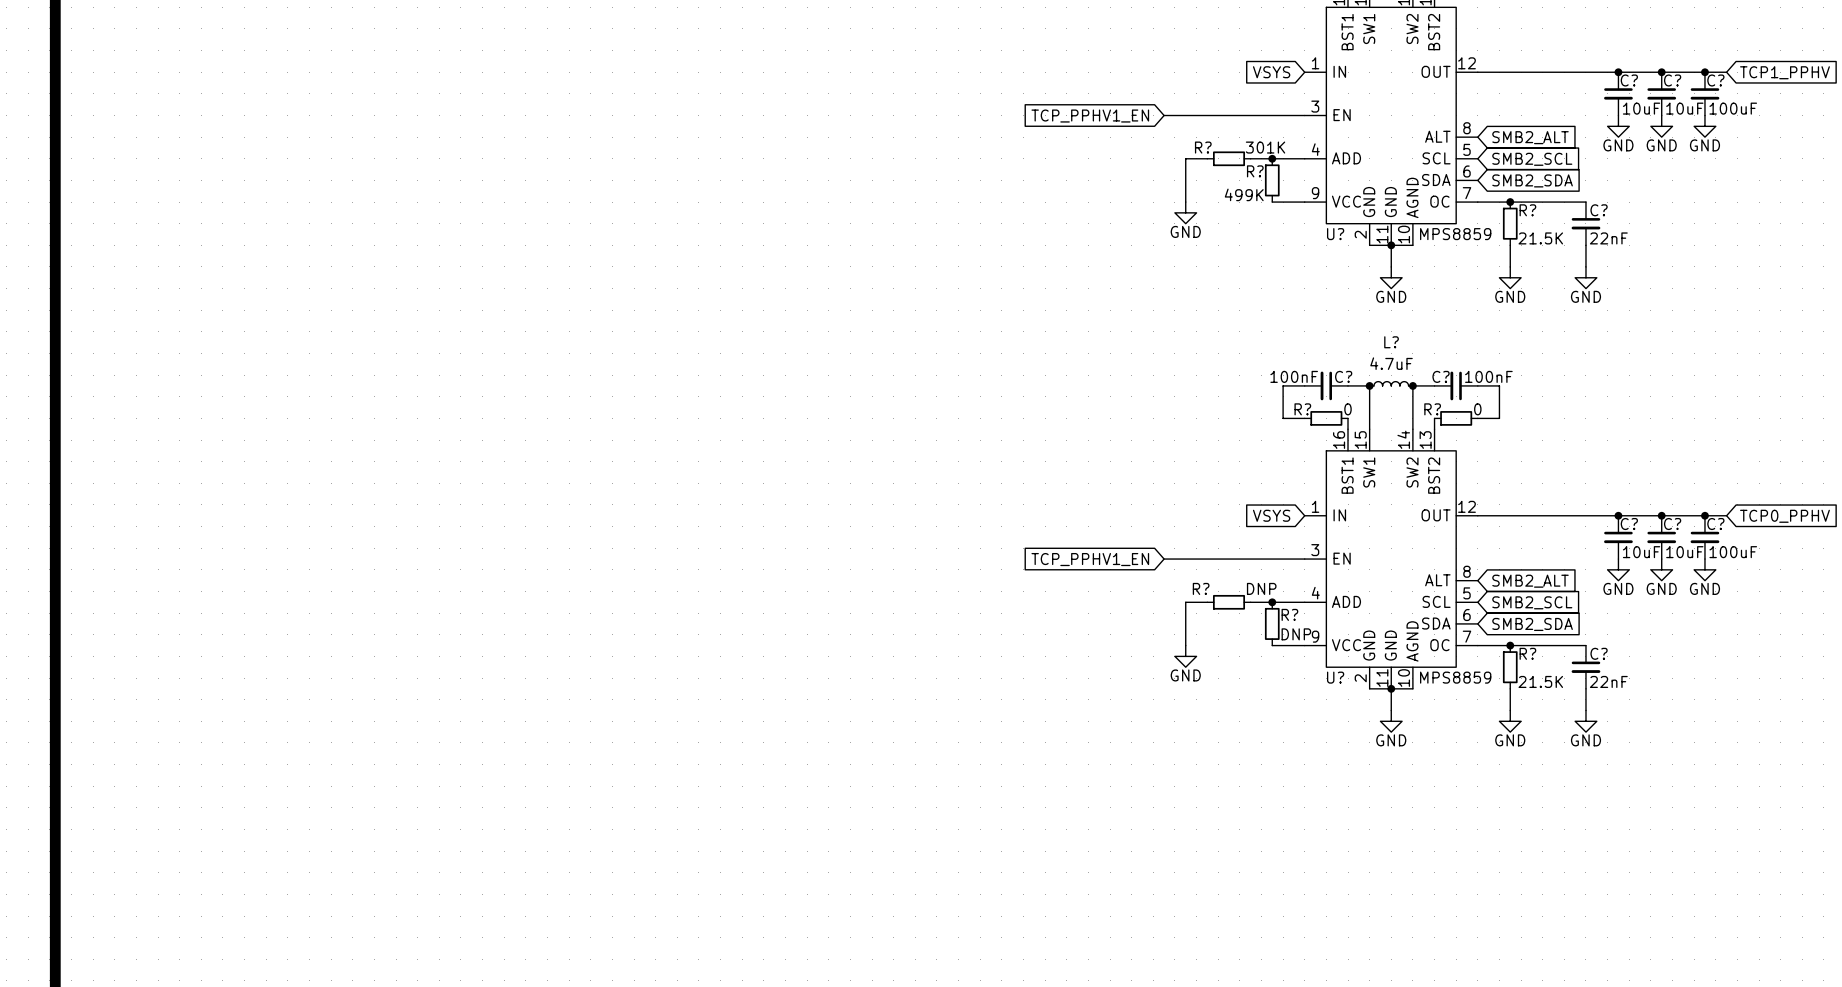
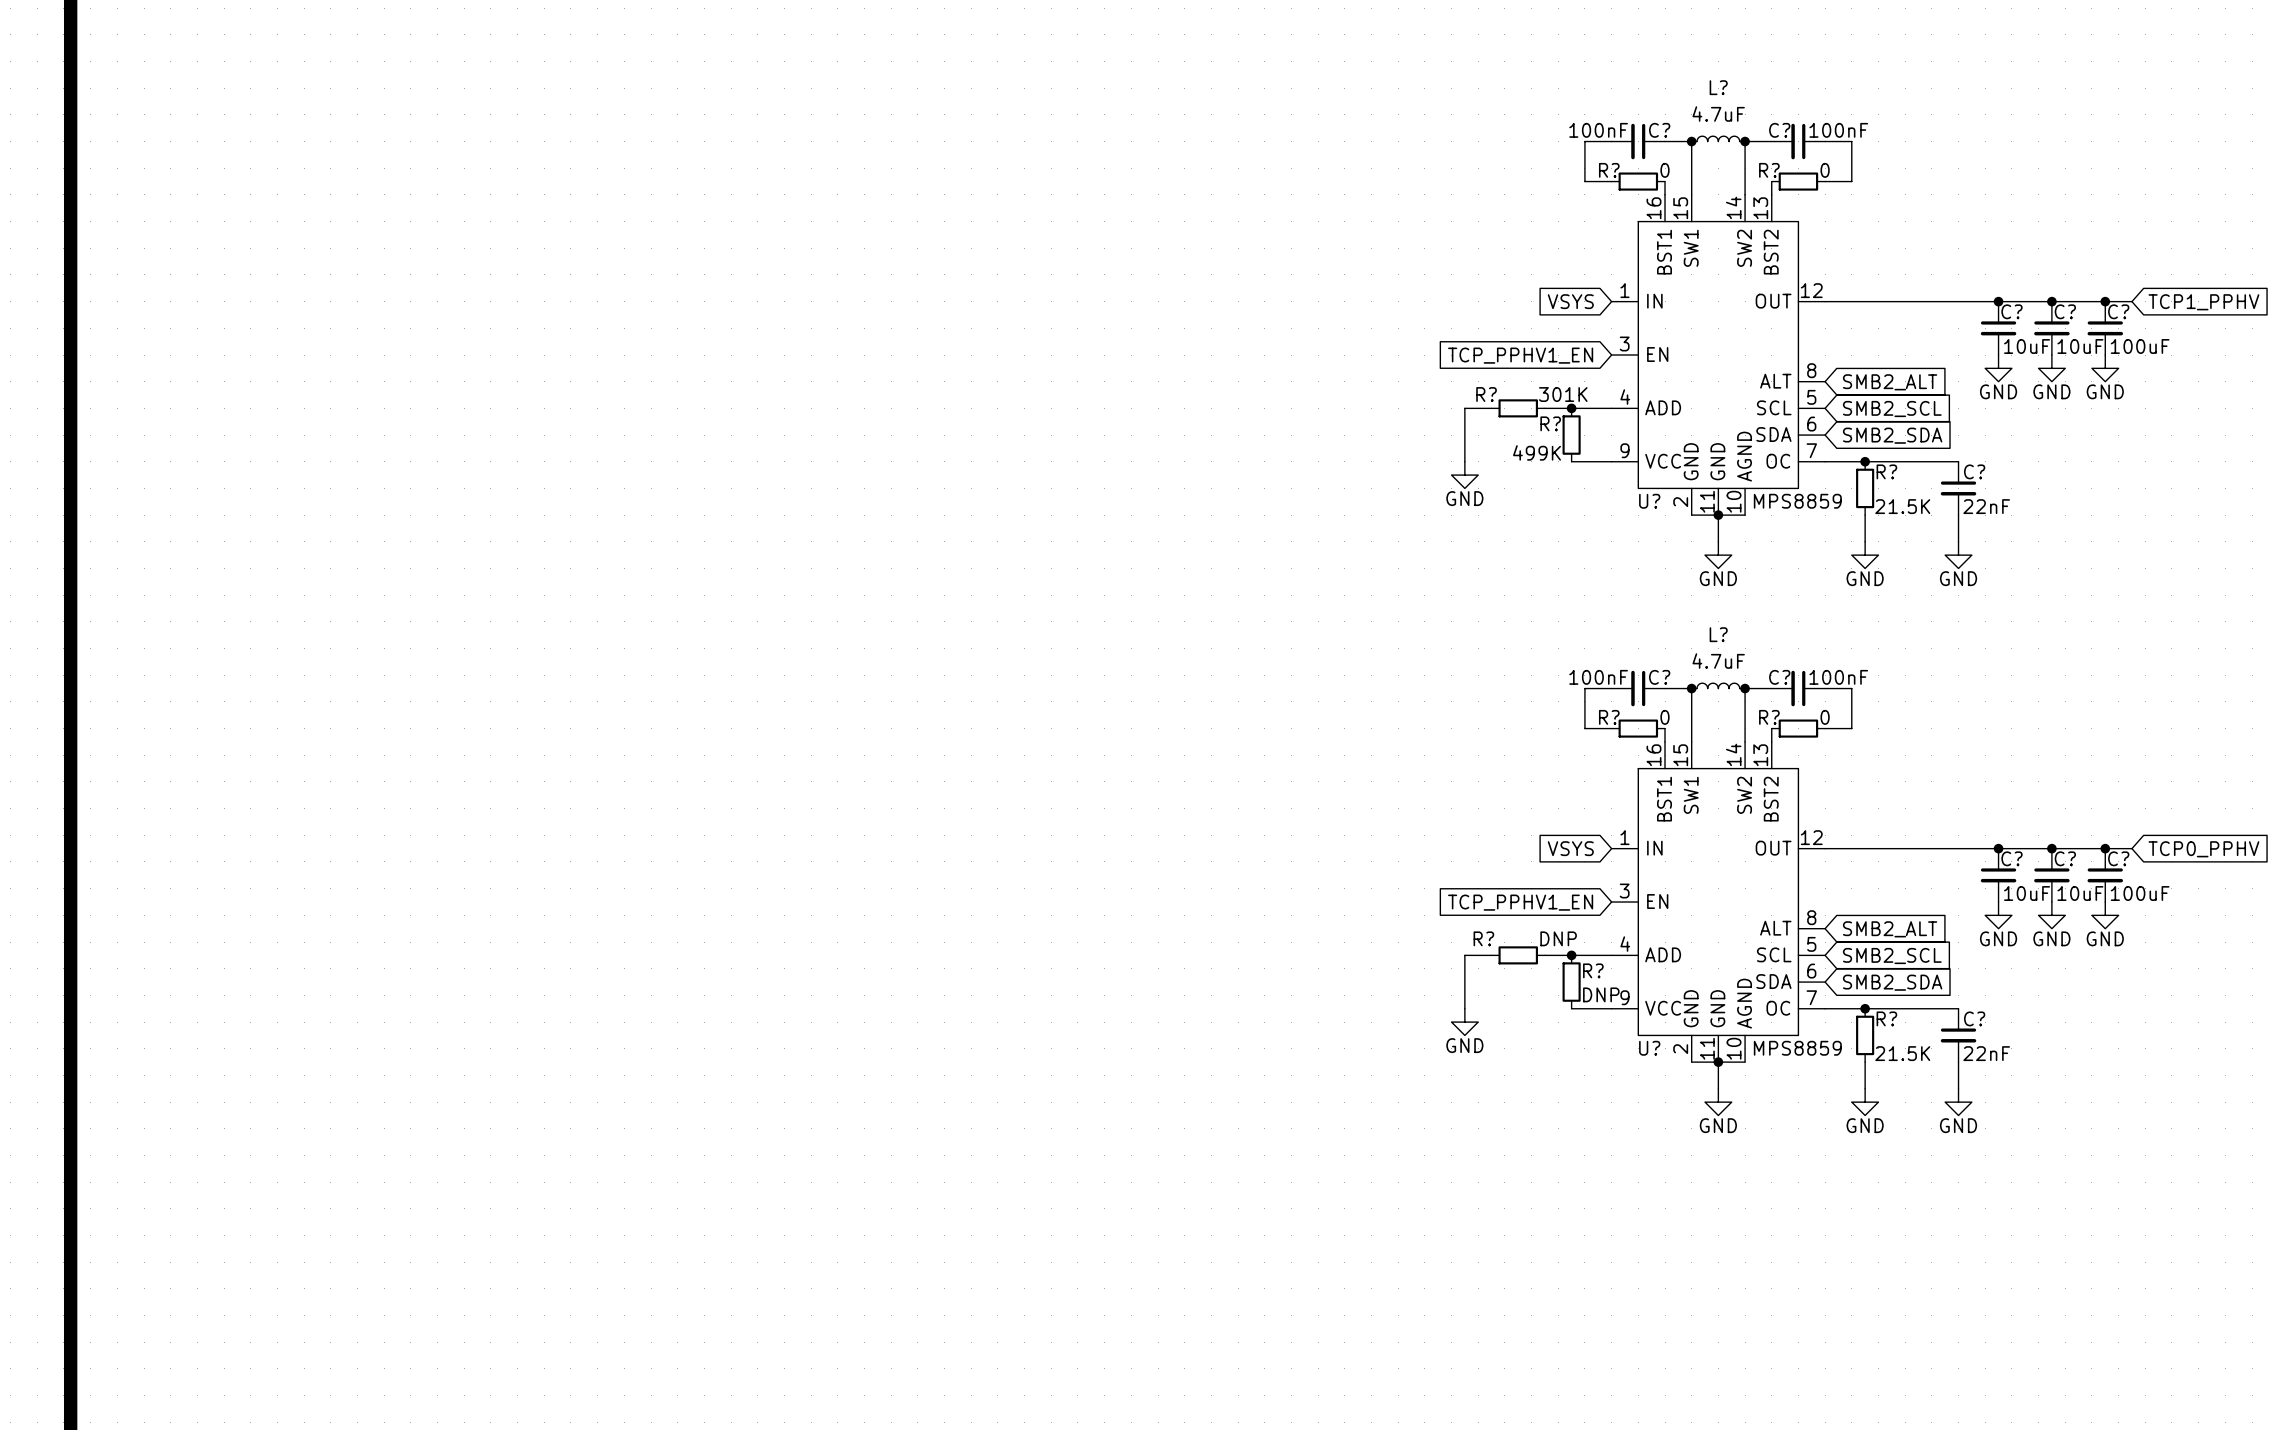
wire: (1164, 115) (1304, 115) -> none
global label position: TCP_PPHV1_EN (1090, 116) -> TCP_PPHV1_EN (1520, 355)
global label position: TCP_PPHV1_EN (1090, 559) -> TCP_PPHV1_EN (1520, 902)
wire: (1164, 559) (1304, 559) -> none

